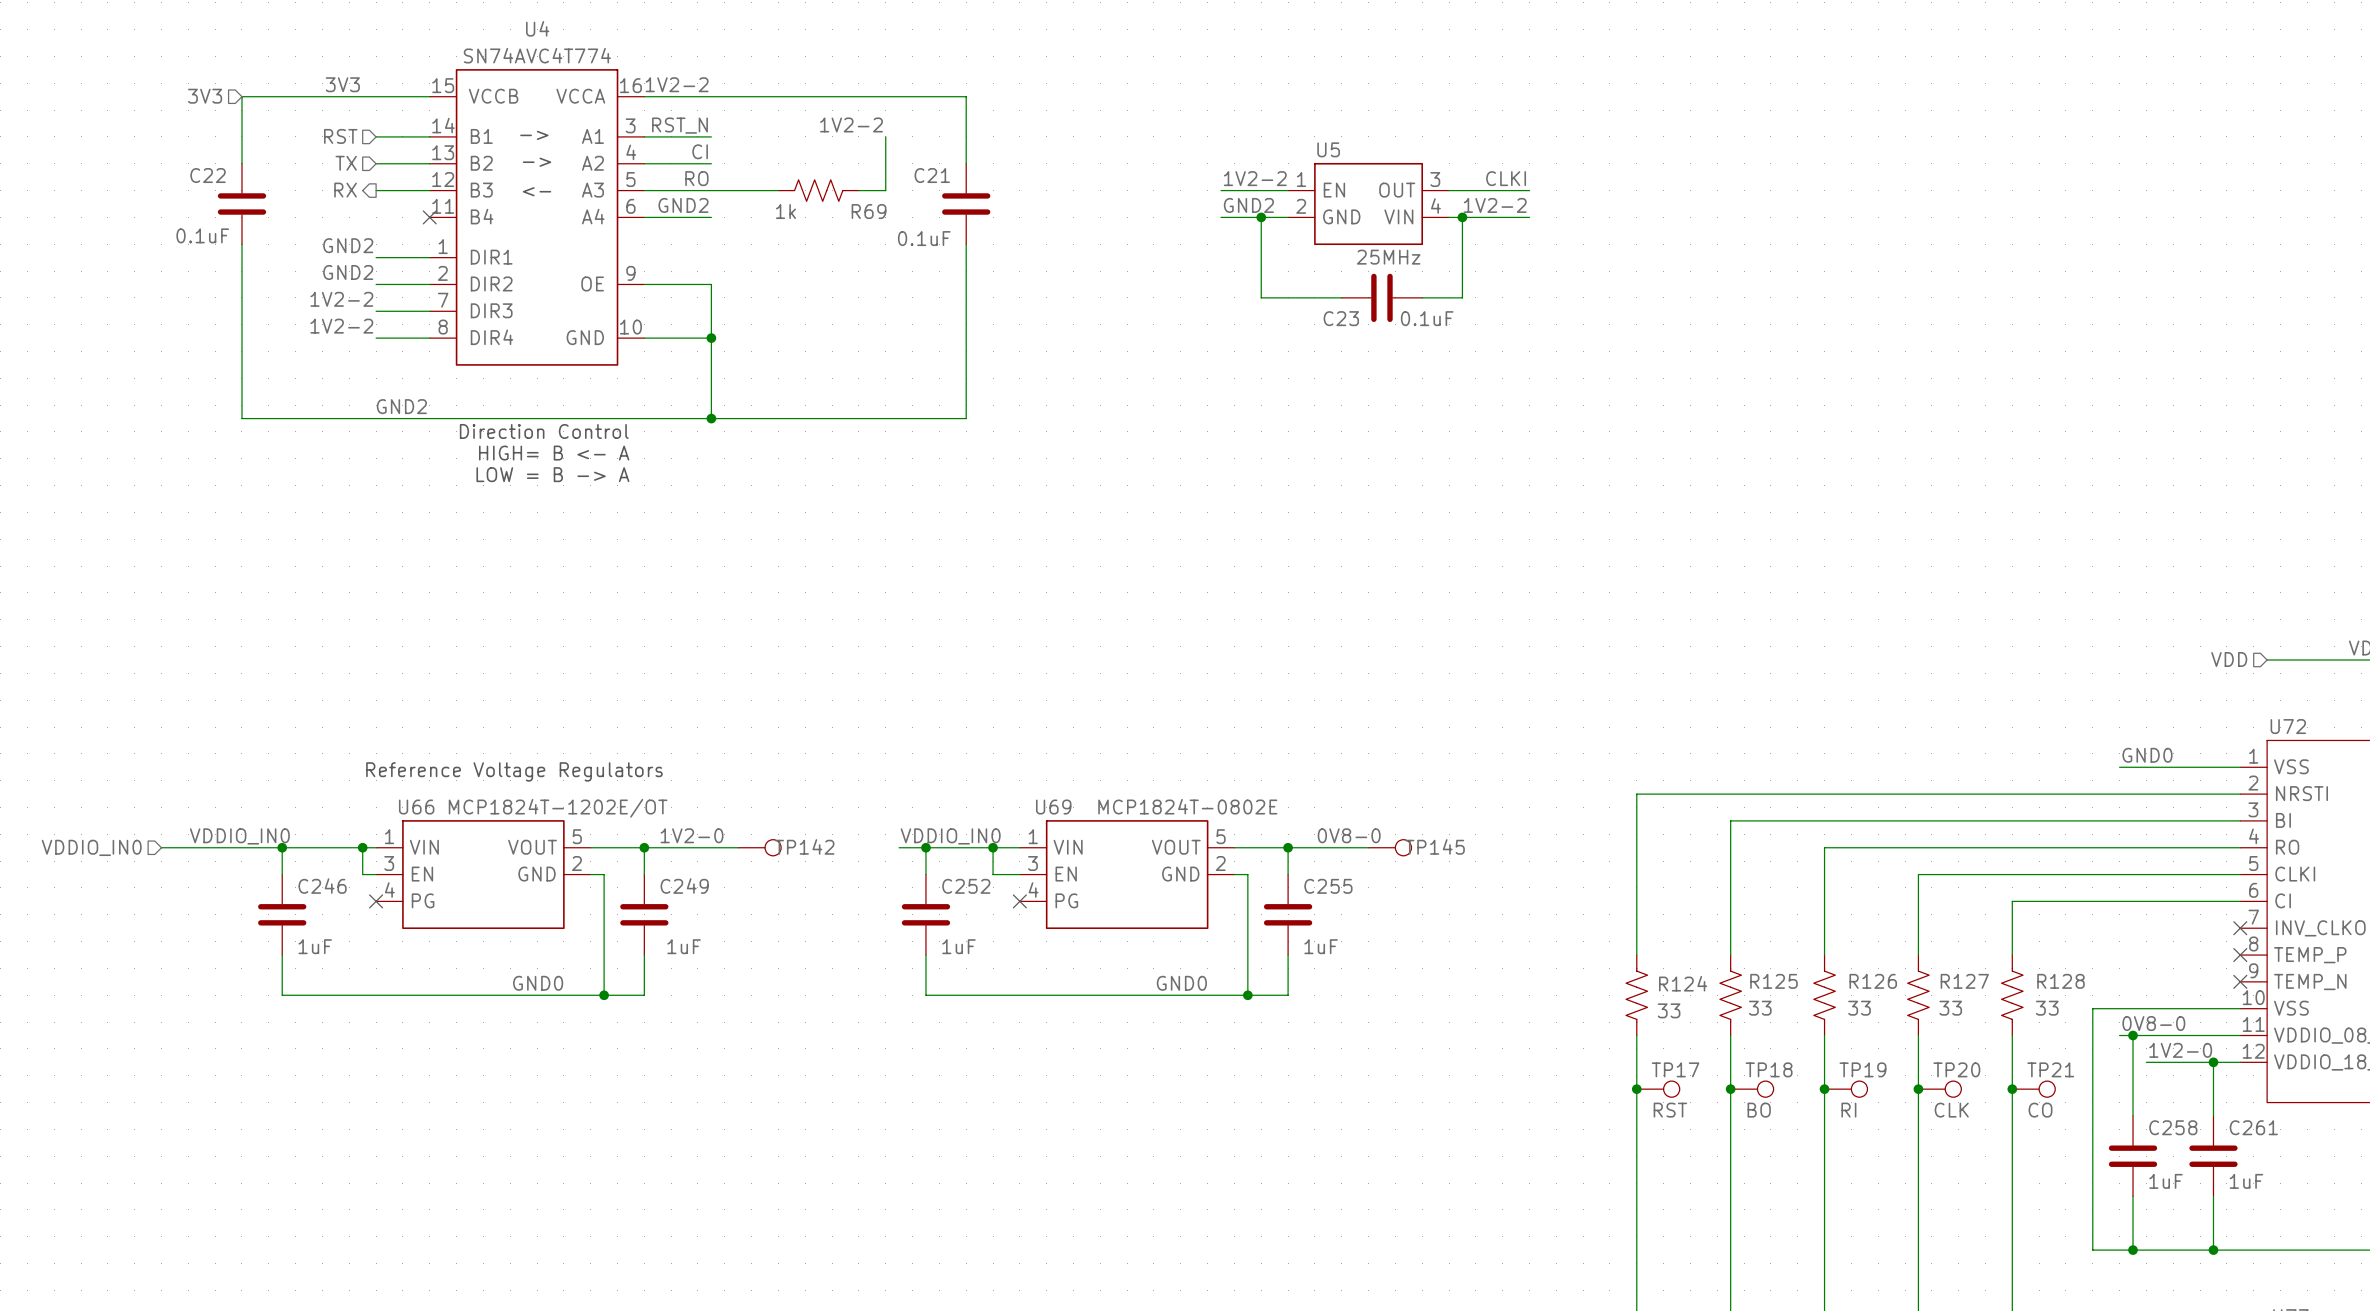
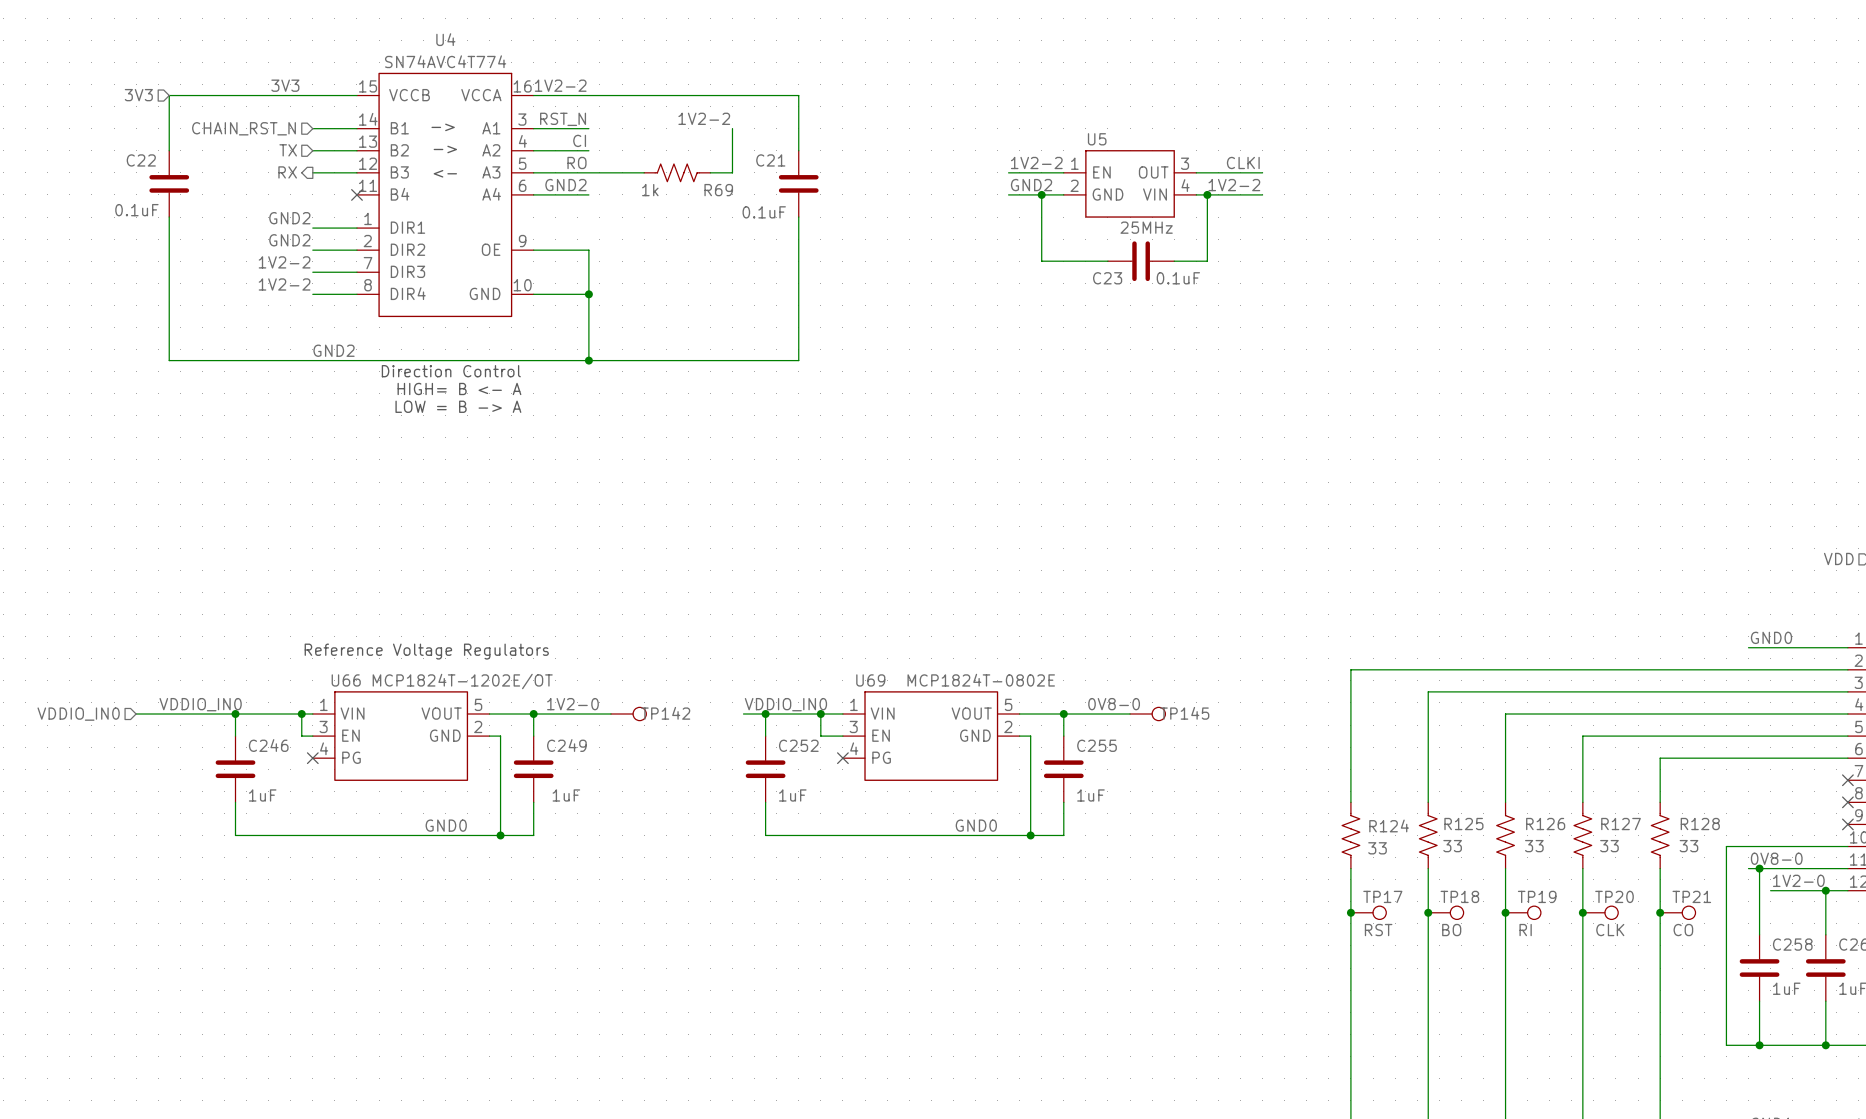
hierarchical label position: 3V3 (205, 96) -> 3V3 (138, 95)
wire: (241, 96) (241, 163) -> (202, 95) (169, 95) (169, 150)
hierarchical label: RST (340, 136) -> CHAIN_RST_N (244, 128)
C22 position: (241, 204) -> (169, 183)
wire: (241, 244) (241, 418) -> (169, 217) (169, 360) (202, 360)

